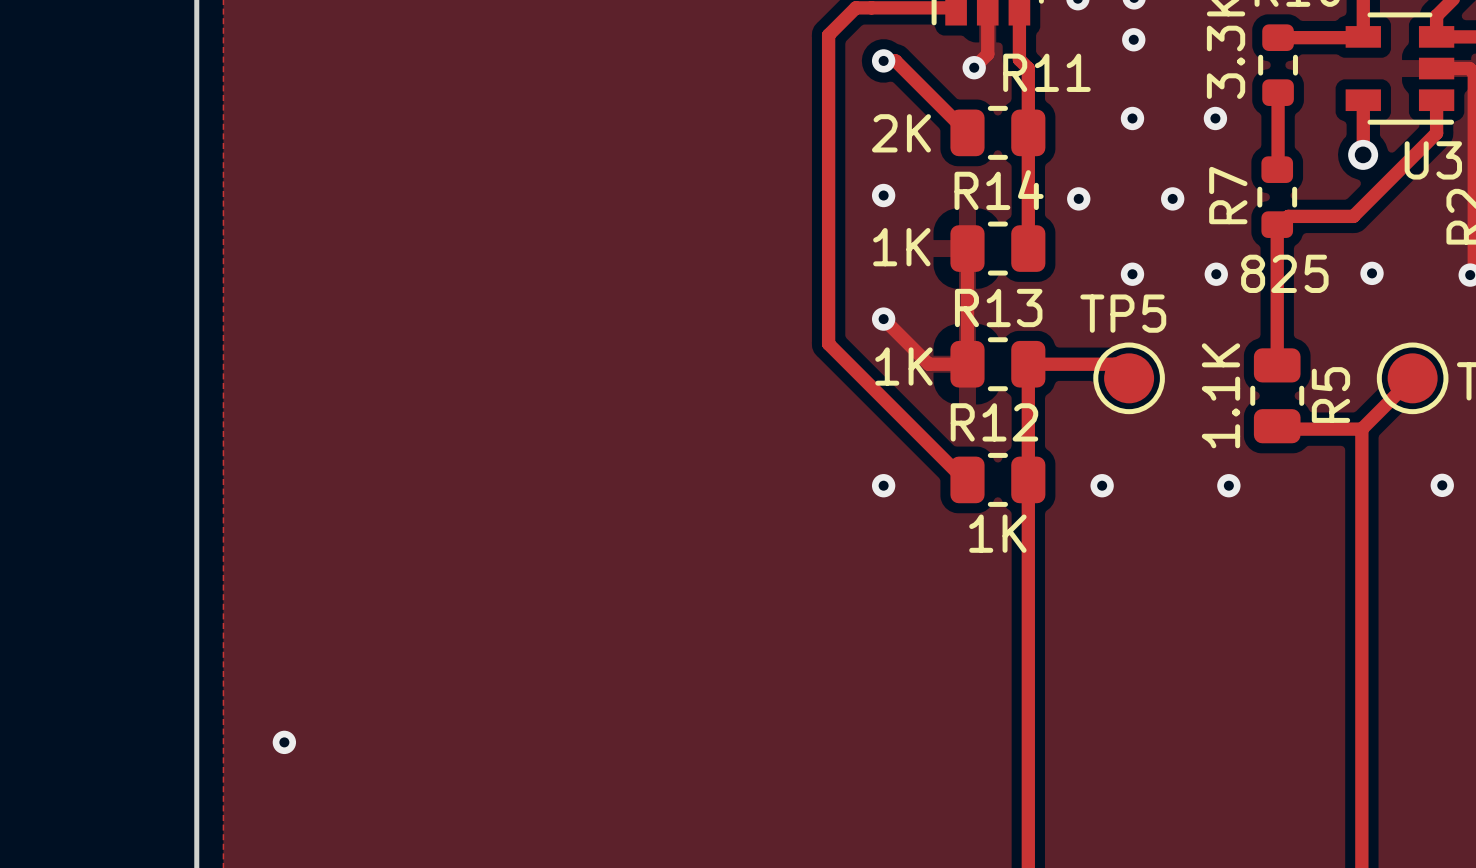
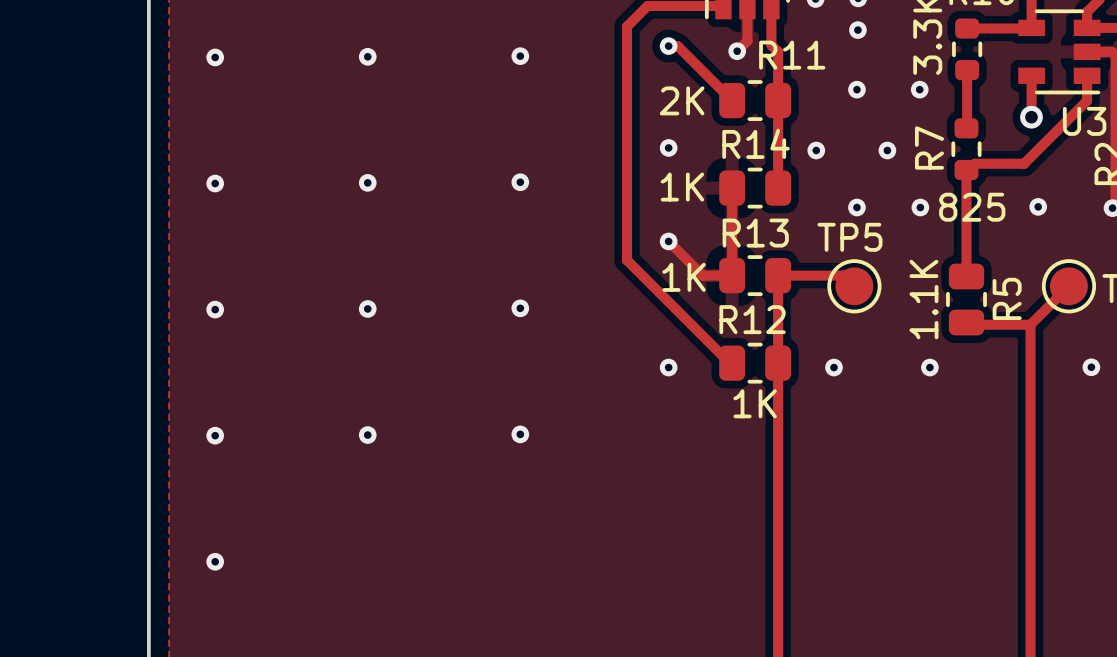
via: none -> (520, 56)
via: none -> (215, 57)
via: none -> (367, 56)
via: none -> (520, 182)
via: none -> (367, 182)
via: none -> (215, 183)
via: none -> (520, 308)
via: none -> (367, 308)
via: none -> (215, 309)
via: none -> (367, 435)
via: none -> (520, 434)
via: none -> (215, 435)

